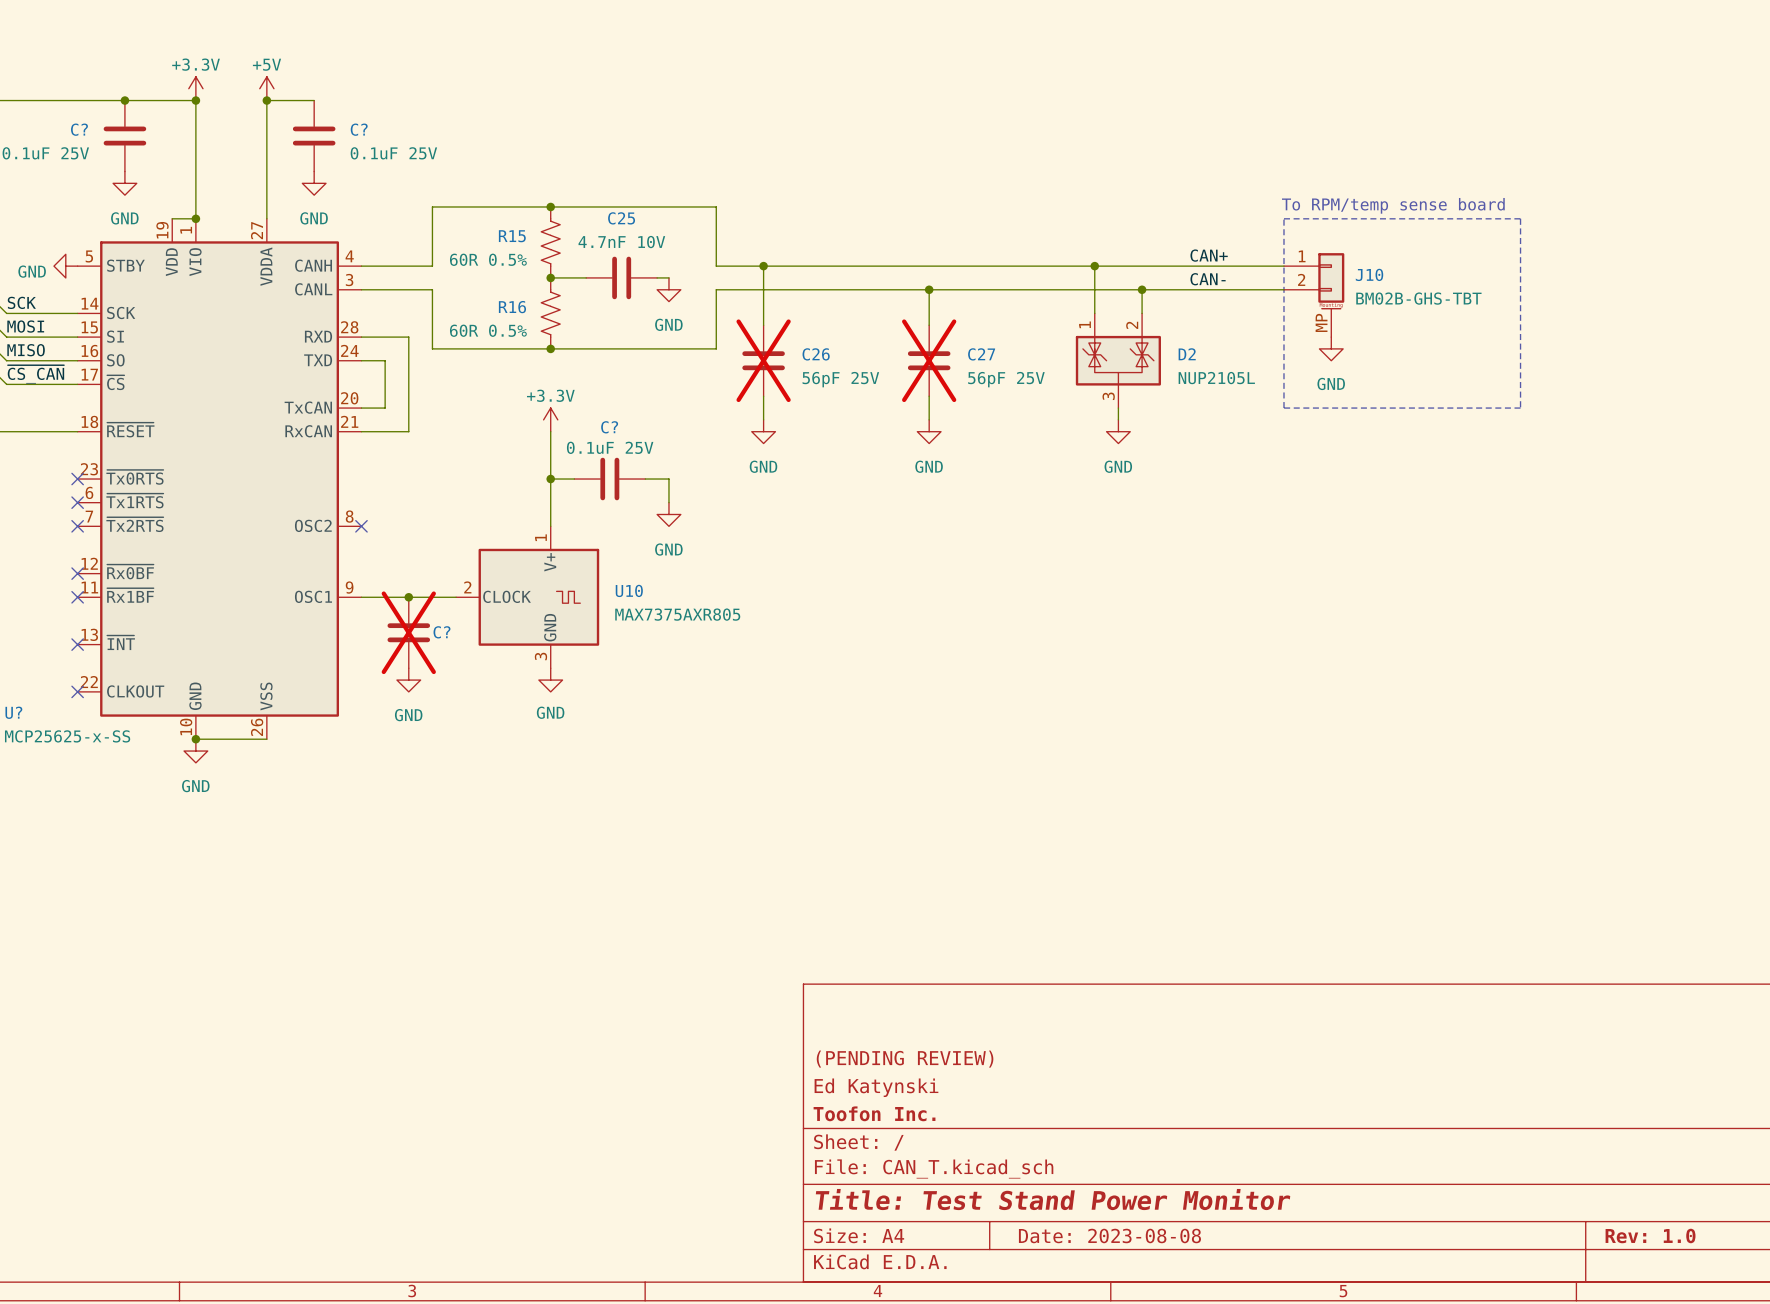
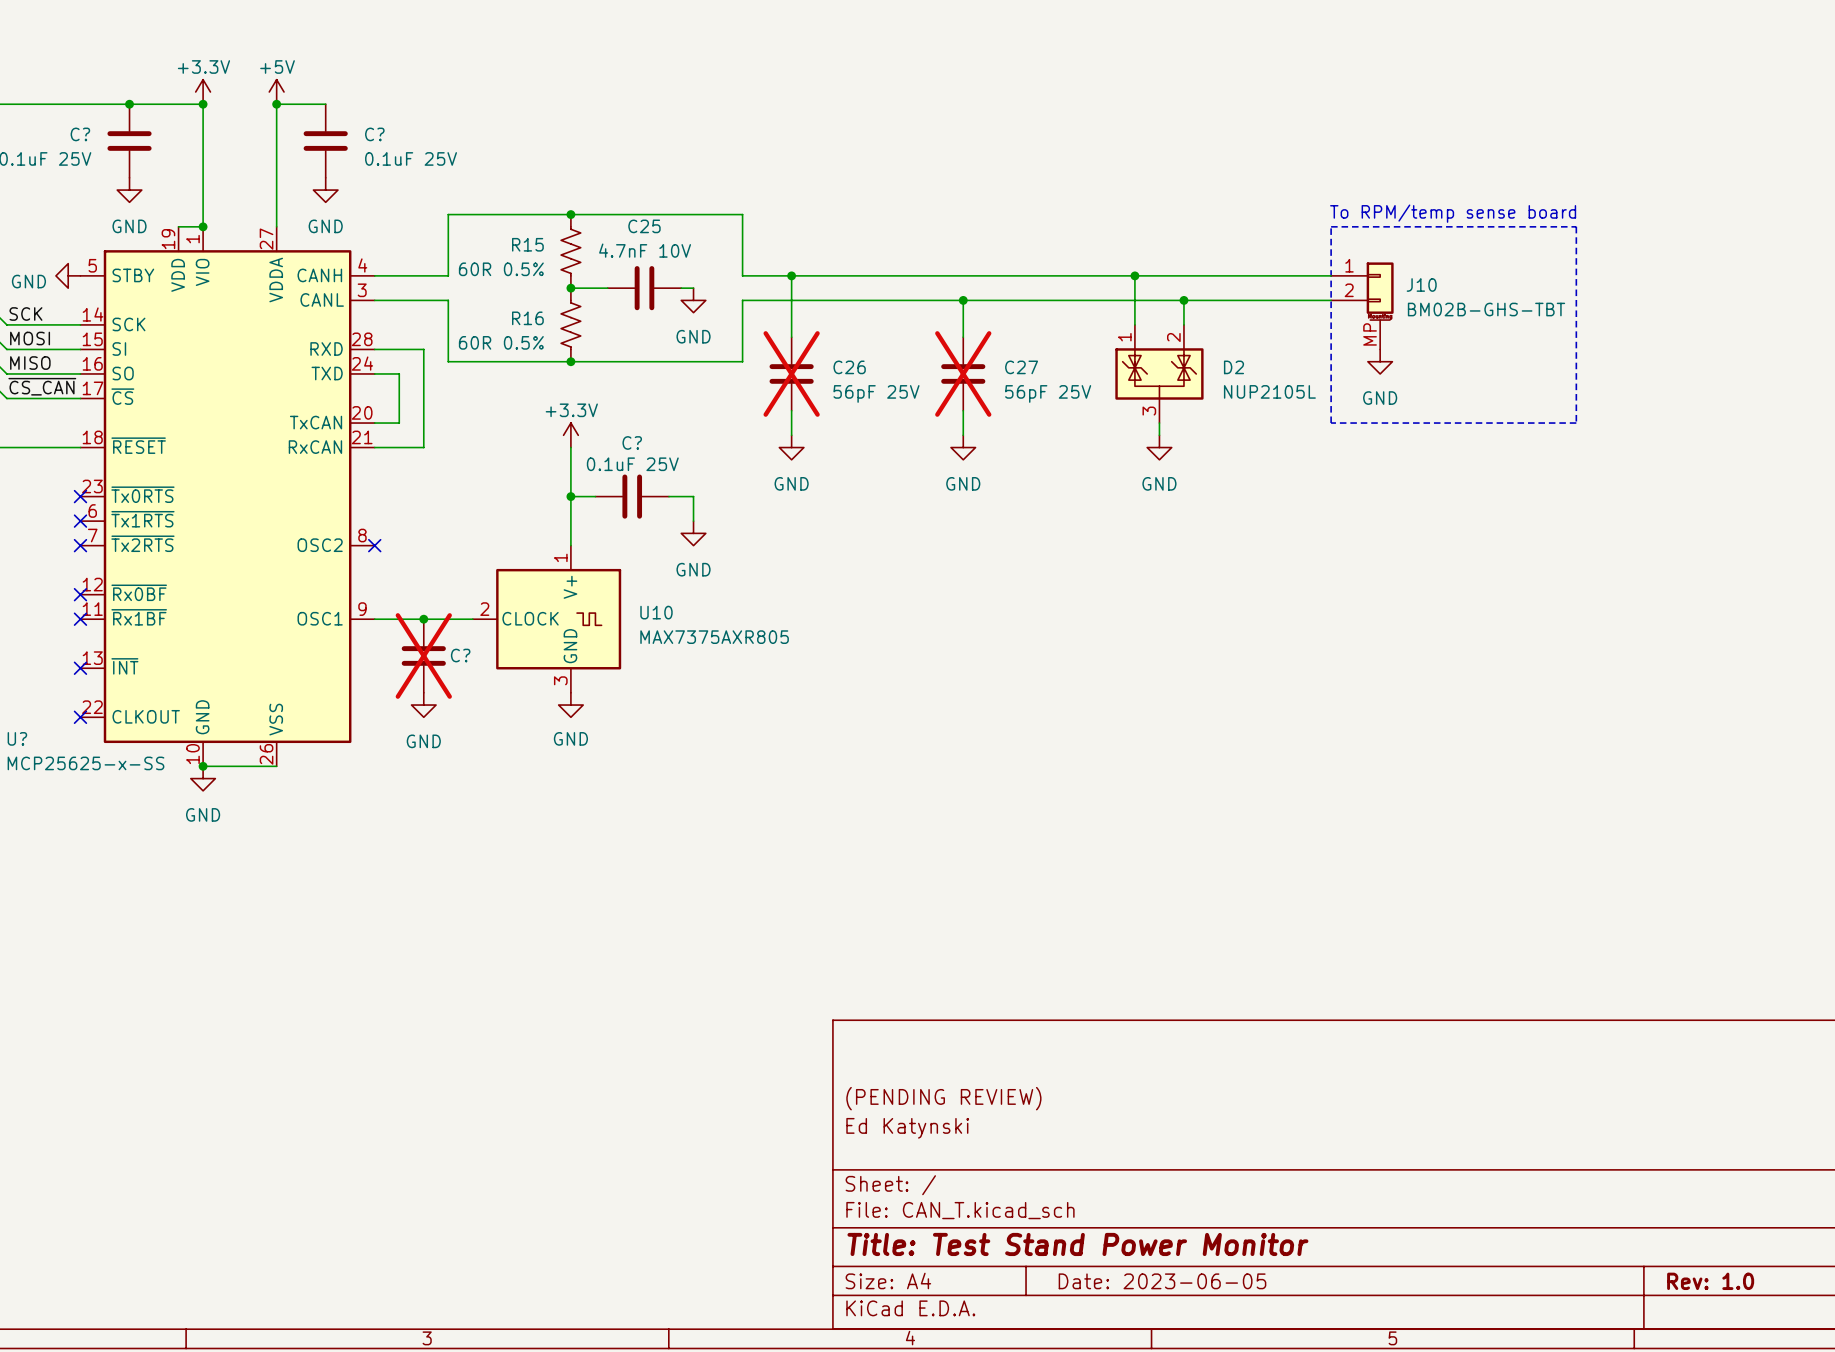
label: CAN+ (1209, 255) -> none
label: CAN- (1208, 279) -> none
title block: Toofon Inc. (874, 1113) -> none
title block: Date: 2023-08-08 (1109, 1235) -> Date: 2023-06-05 (1162, 1281)

